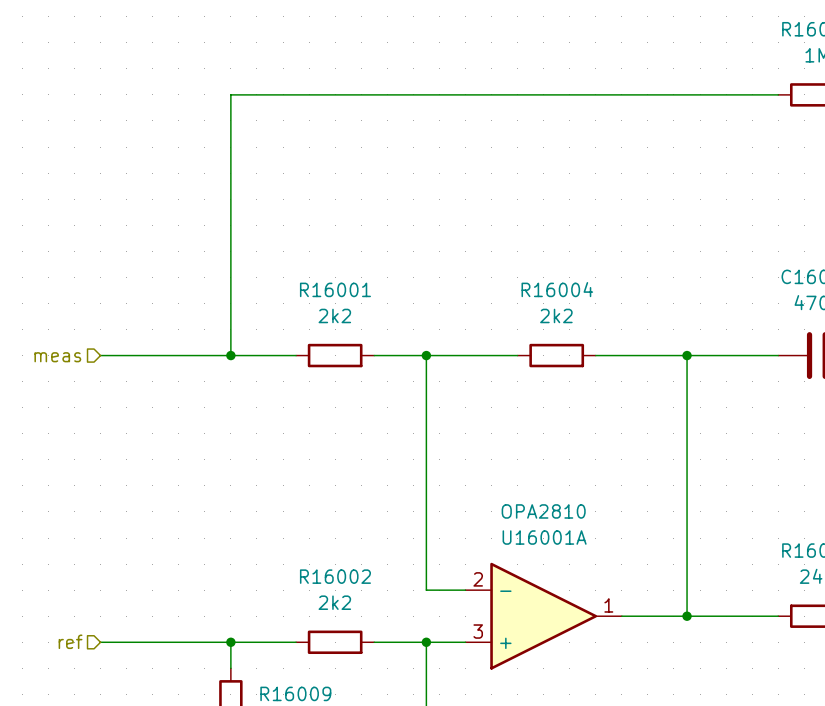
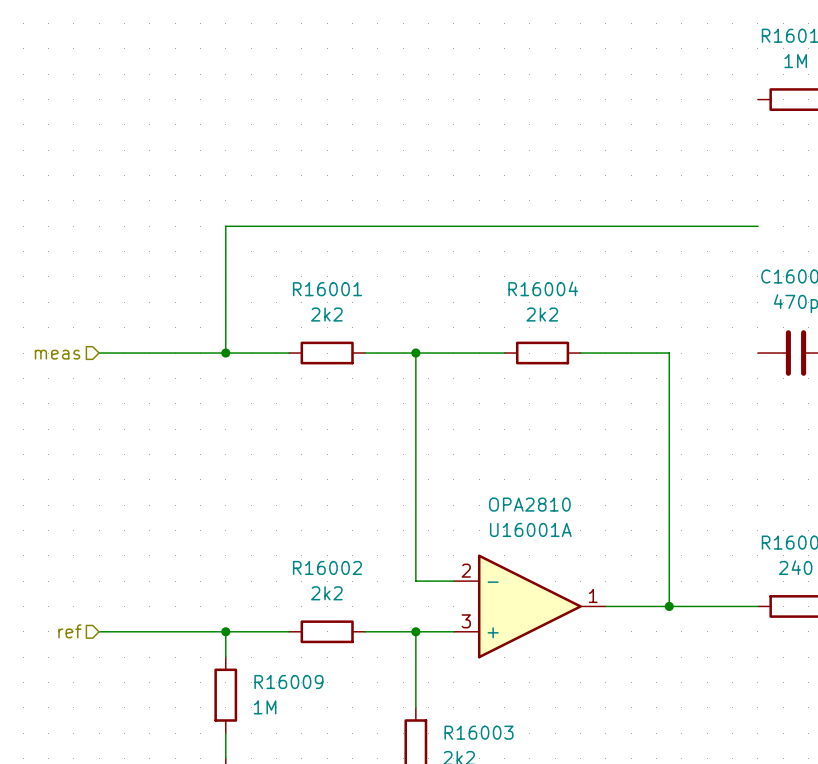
wire: (778, 94) (230, 94) (230, 225) -> (757, 226) (225, 226)
wire: (687, 355) (778, 355) -> none
junction: (687, 355) -> none

